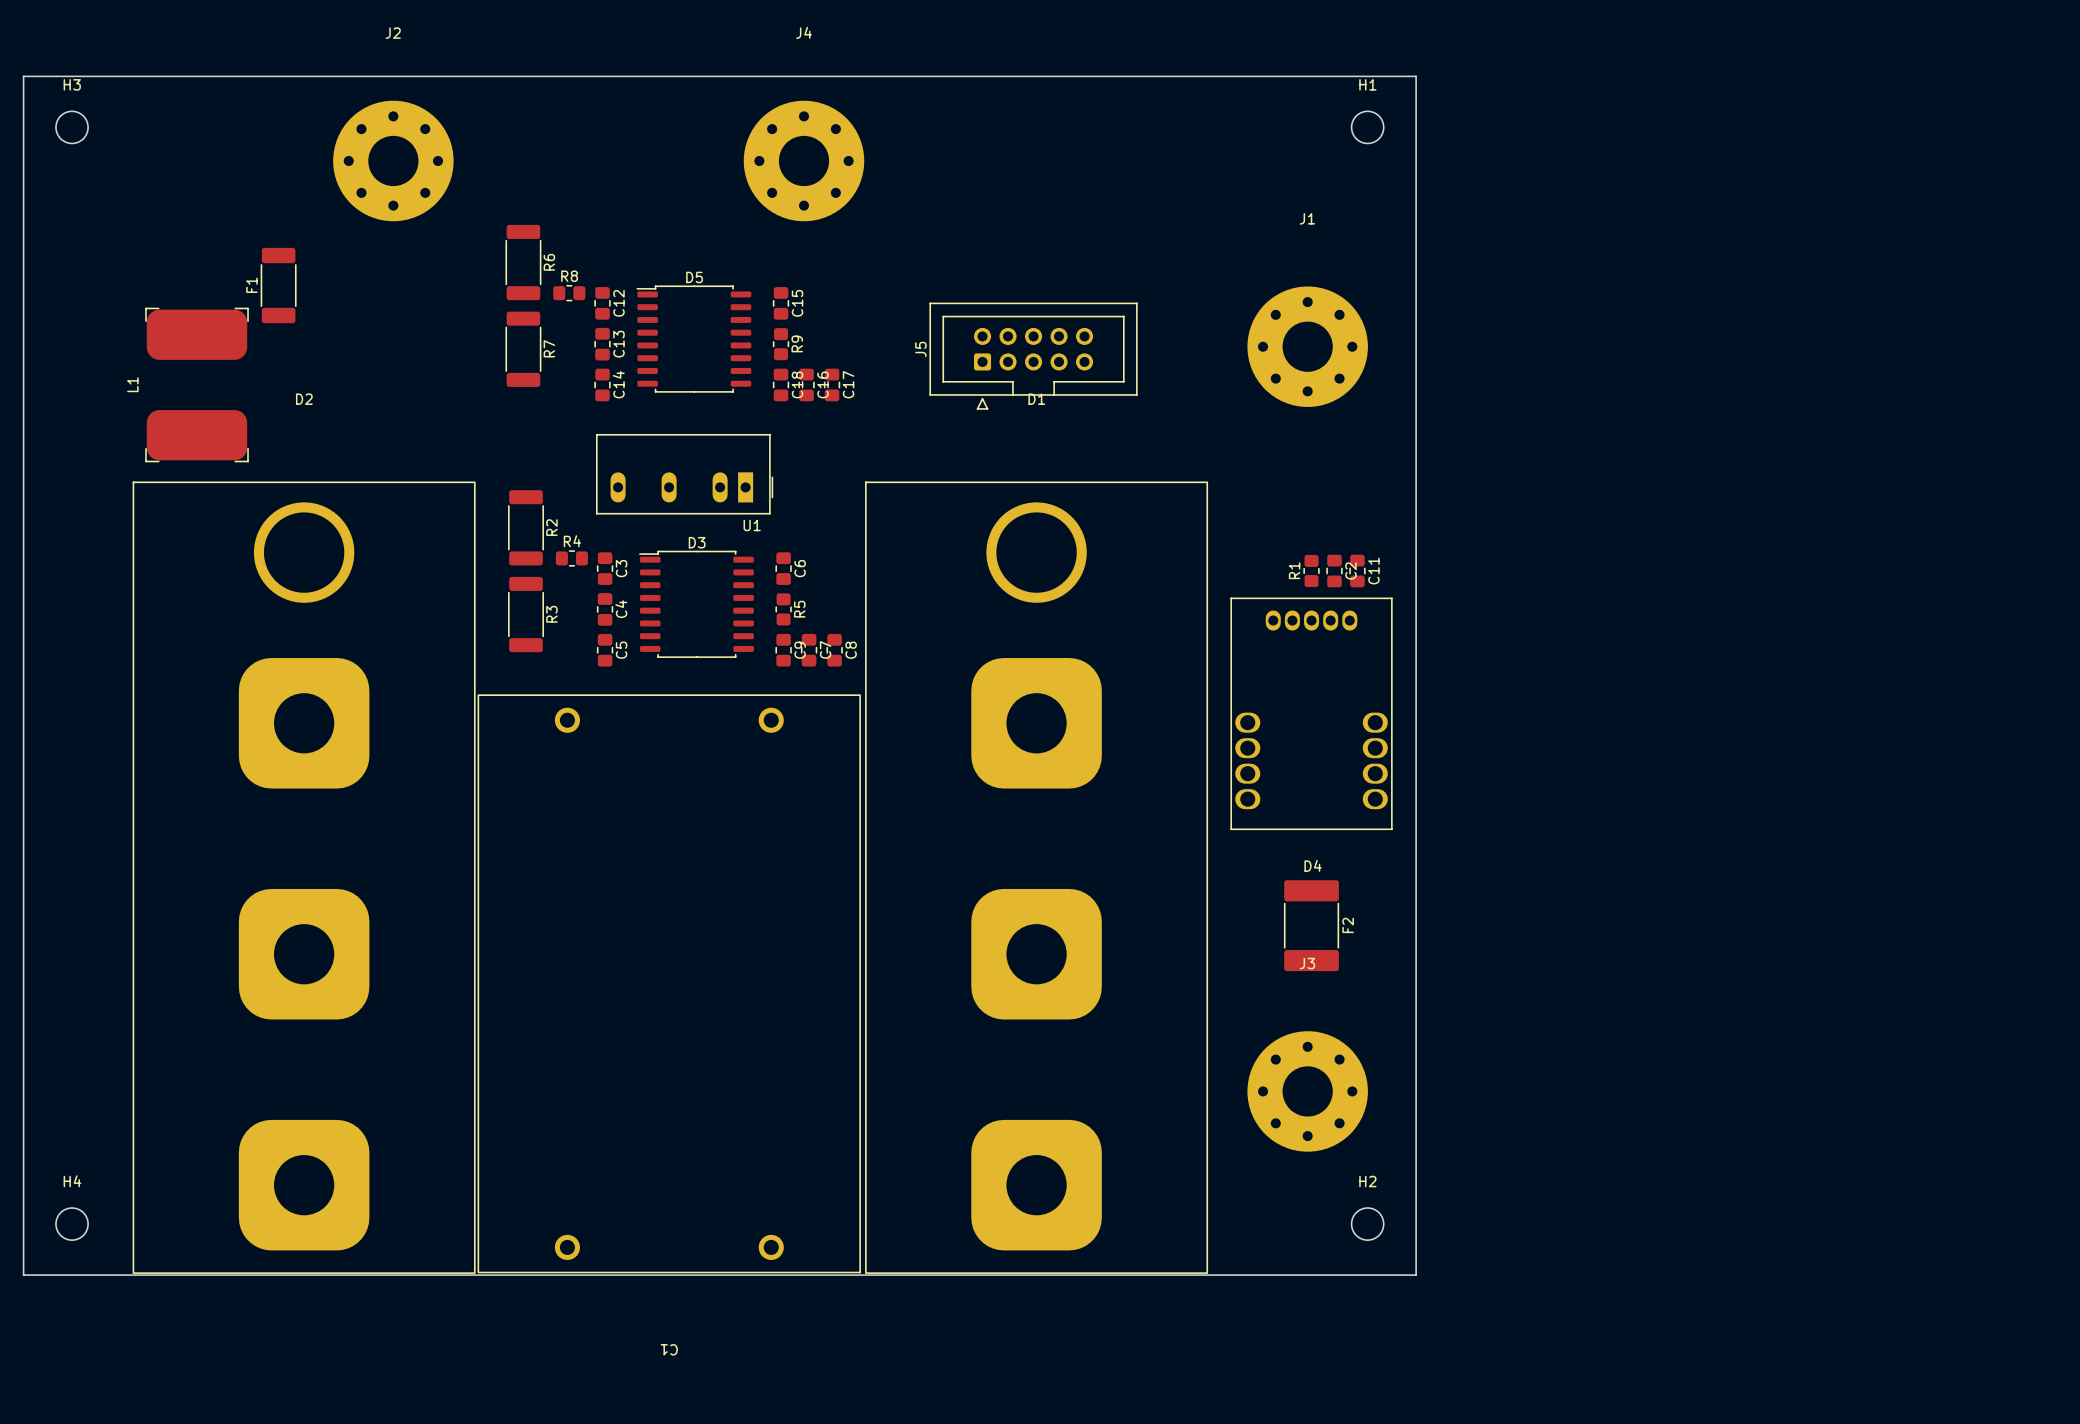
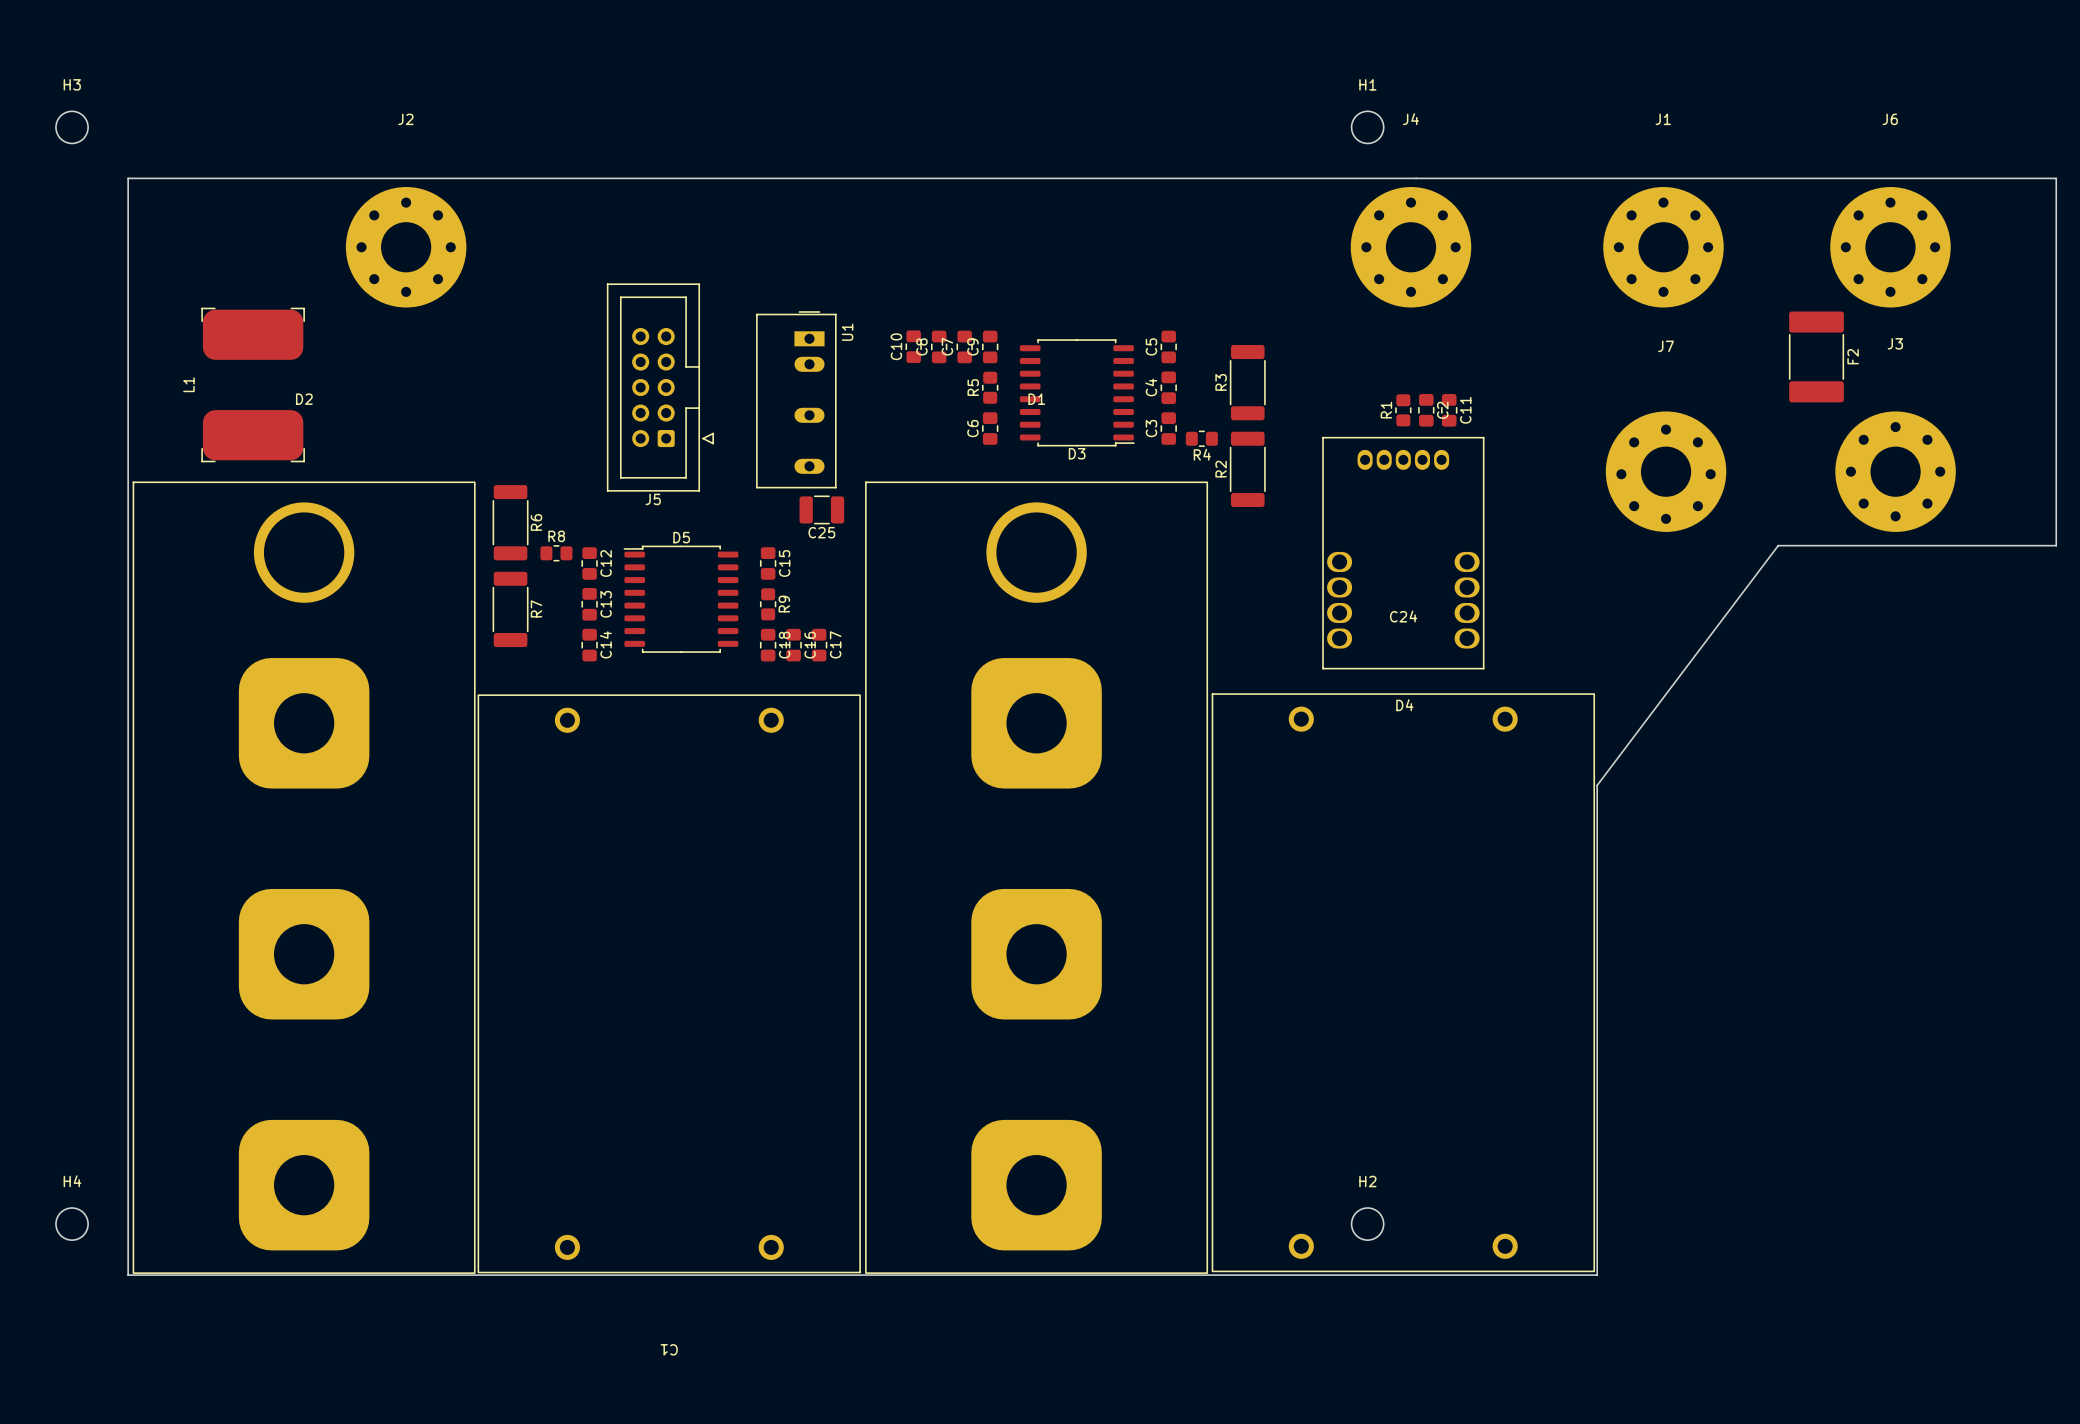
J2 position: (393, 160) -> (406, 247)
J4 position: (804, 160) -> (1411, 247)
J6: none -> (1890, 247)
R6 position: (523, 262) -> (510, 522)
F1: (278, 285) -> none
R8 position: (569, 293) -> (556, 553)
C12 position: (602, 303) -> (589, 563)
C15 position: (781, 303) -> (768, 563)
D5 position: (694, 339) -> (681, 599)
C13 position: (602, 344) -> (589, 604)
R9 position: (781, 344) -> (768, 604)
C10: none -> (913, 346)
J1 position: (1307, 346) -> (1663, 247)
R7 position: (523, 349) -> (510, 609)
J5 rotation: 0° (1033, 356) -> 90° counterclockwise (660, 387)
J5 position: (1033, 356) -> (660, 387)
L1 position: (197, 384) -> (253, 384)
C14 position: (602, 384) -> (589, 645)
C18 position: (781, 384) -> (768, 645)
C16 position: (806, 384) -> (793, 645)
C17 position: (832, 384) -> (819, 645)
J7: none -> (1666, 471)
U1 rotation: 0° (684, 474) -> 90° counterclockwise (796, 399)
U1 position: (684, 474) -> (796, 399)
C25: none -> (821, 509)
R2 position: (526, 527) -> (1247, 469)
R2 name position: R2 (551, 527) -> R2 (1221, 469)
R4 name position: R4 (572, 541) -> R4 (1202, 454)
R4 position: (571, 558) -> (1201, 438)
C3 position: (605, 568) -> (1168, 428)
C3 name position: C3 (621, 568) -> C3 (1151, 428)
C6 position: (783, 568) -> (990, 428)
C6 name position: C6 (800, 568) -> C6 (972, 428)
R1 position: (1311, 571) -> (1403, 410)
C2 position: (1334, 571) -> (1426, 410)
C11 position: (1357, 571) -> (1449, 410)
D3 rotation: 0° (696, 604) -> 180° (1077, 392)
D3 position: (696, 604) -> (1077, 392)
C4 position: (605, 609) -> (1168, 387)
C4 name position: C4 (621, 609) -> C4 (1151, 387)
R5 position: (783, 609) -> (990, 387)
R5 name position: R5 (799, 609) -> R5 (973, 387)
R3 position: (526, 614) -> (1247, 382)
R3 name position: R3 (551, 614) -> R3 (1221, 382)
C7 name position: C7 (825, 649) -> C7 (947, 346)
C5 position: (605, 650) -> (1168, 346)
C5 name position: C5 (621, 650) -> C5 (1151, 346)
C9 position: (783, 650) -> (990, 346)
C9 name position: C9 (800, 650) -> C9 (972, 346)
C7 position: (809, 650) -> (964, 346)
C8 position: (834, 650) -> (939, 346)
C8 name position: C8 (851, 650) -> C8 (921, 346)
D4 position: (1311, 713) -> (1403, 553)
F2 position: (1311, 925) -> (1816, 356)
C24: none -> (1403, 982)
J3 position: (1307, 1091) -> (1895, 471)
board edge: (128, 1275) (23, 1275) (23, 76) (1416, 76) (1416, 1275) -> (128, 1275) (128, 178) (2056, 178) (2056, 545) (1778, 545) (1597, 785) (1597, 1275) (1416, 1275)

